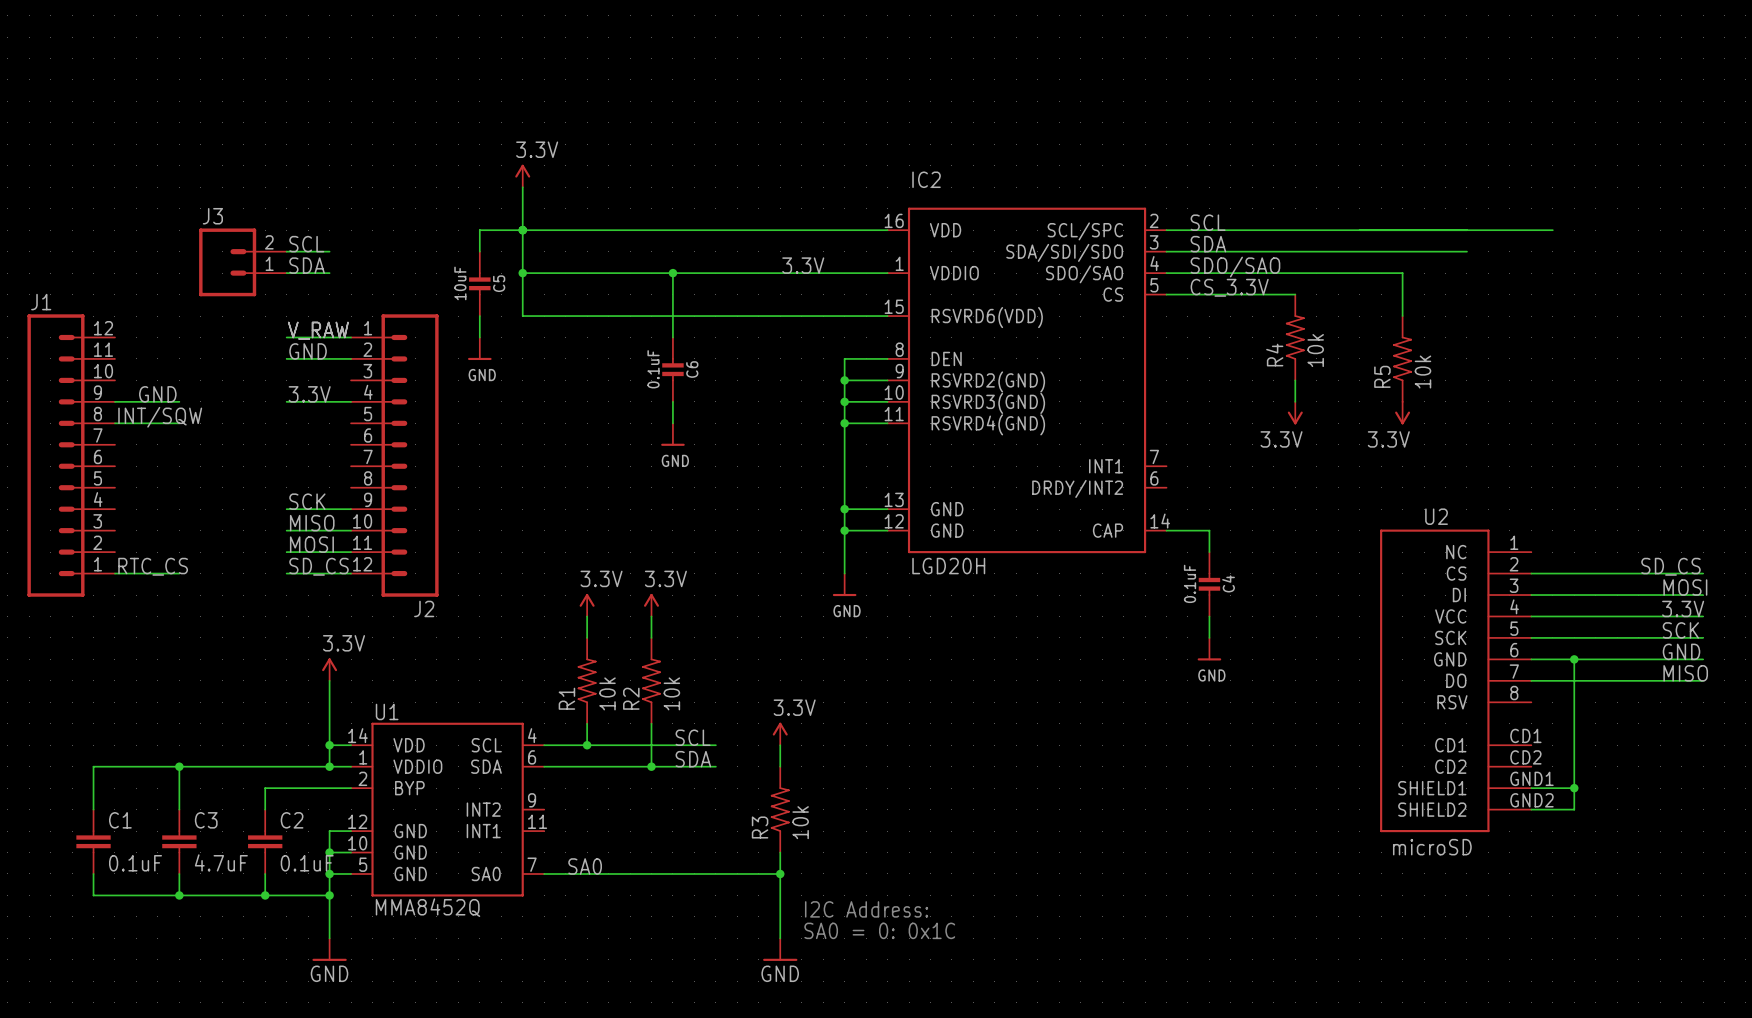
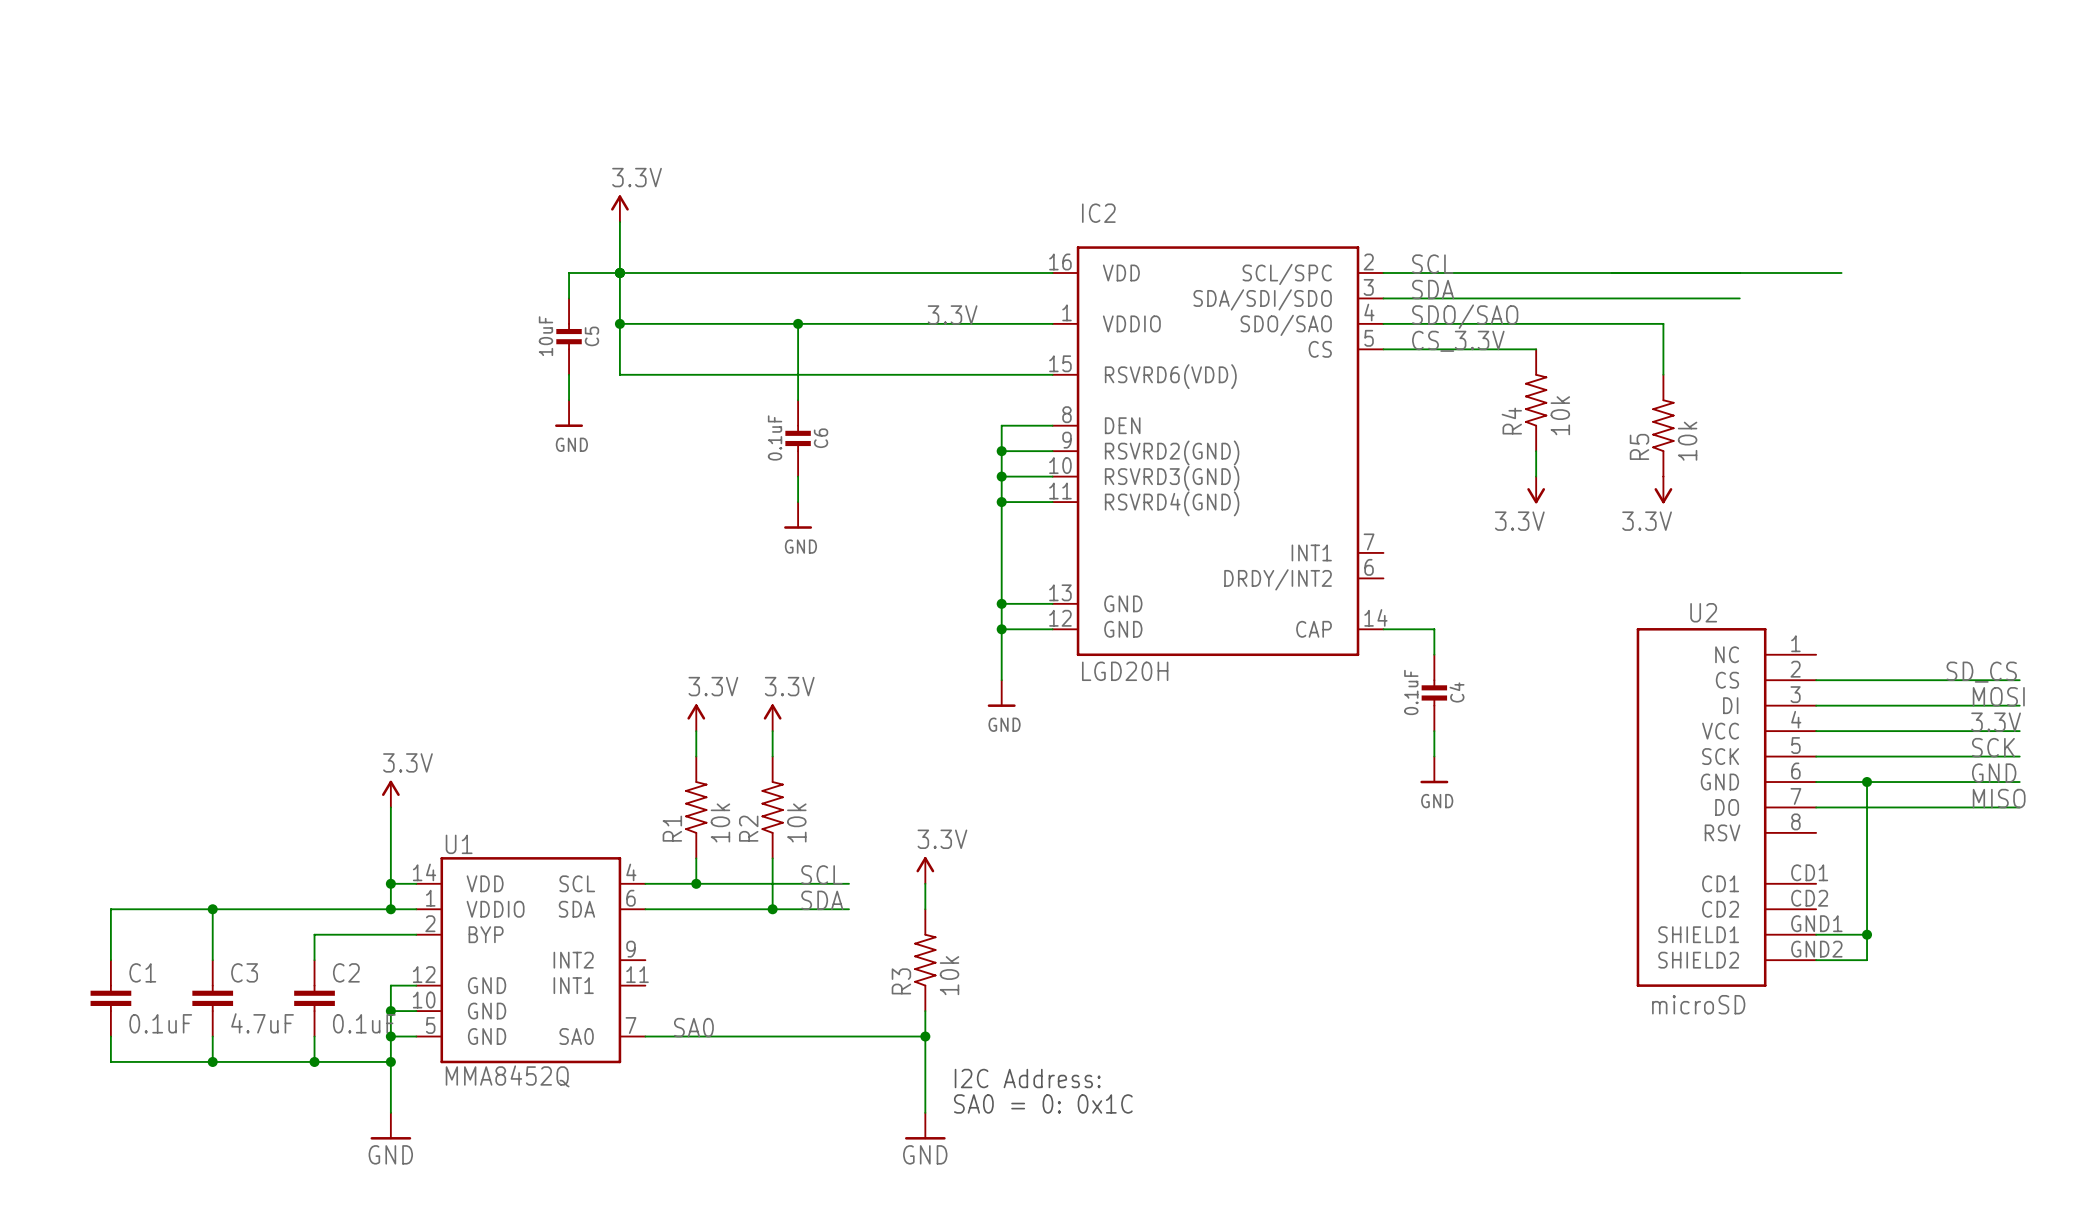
label: SCL (306, 244) -> none
wire: (286, 251) (329, 251) -> none
J3: (242, 262) -> none
label: SDA (307, 265) -> none
wire: (286, 273) (329, 273) -> none
label: V_RAW (318, 330) -> none
wire: (286, 337) (351, 337) -> none
label: GND (308, 351) -> none
wire: (286, 358) (351, 358) -> none
label: GND (157, 394) -> none
label: 3.3V (309, 394) -> none
wire: (114, 401) (179, 401) -> none
wire: (286, 401) (351, 401) -> none
label: INT/SQW (160, 417) -> none
wire: (114, 423) (179, 423) -> none
J1: (71, 455) -> none
J2: (394, 455) -> none
label: SCK (307, 501) -> none
wire: (286, 509) (351, 509) -> none
label: MISO (312, 523) -> none
wire: (286, 530) (351, 530) -> none
label: MOSI (311, 544) -> none
wire: (286, 552) (351, 552) -> none
label: RTC_CS (153, 566) -> none
label: SD_CS (319, 566) -> none
wire: (114, 573) (179, 573) -> none
wire: (286, 573) (351, 573) -> none

